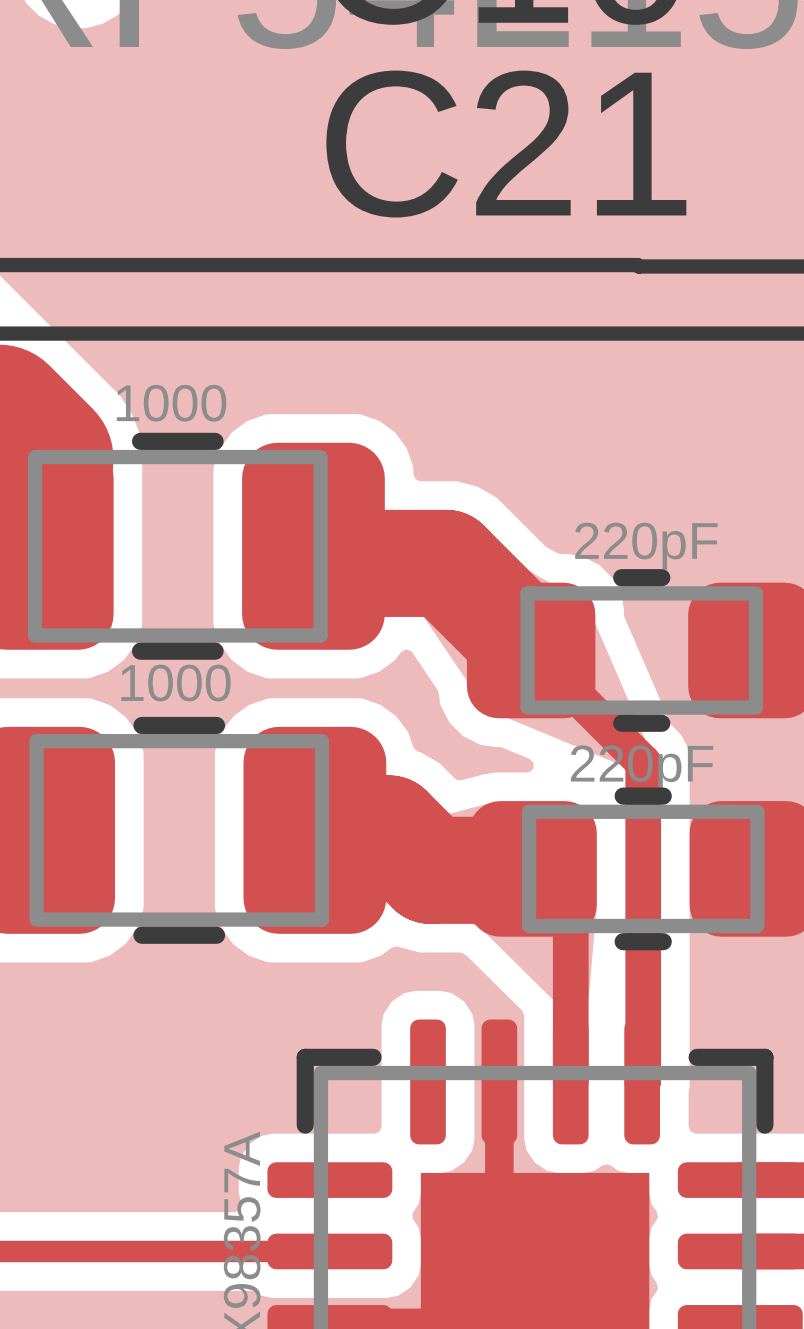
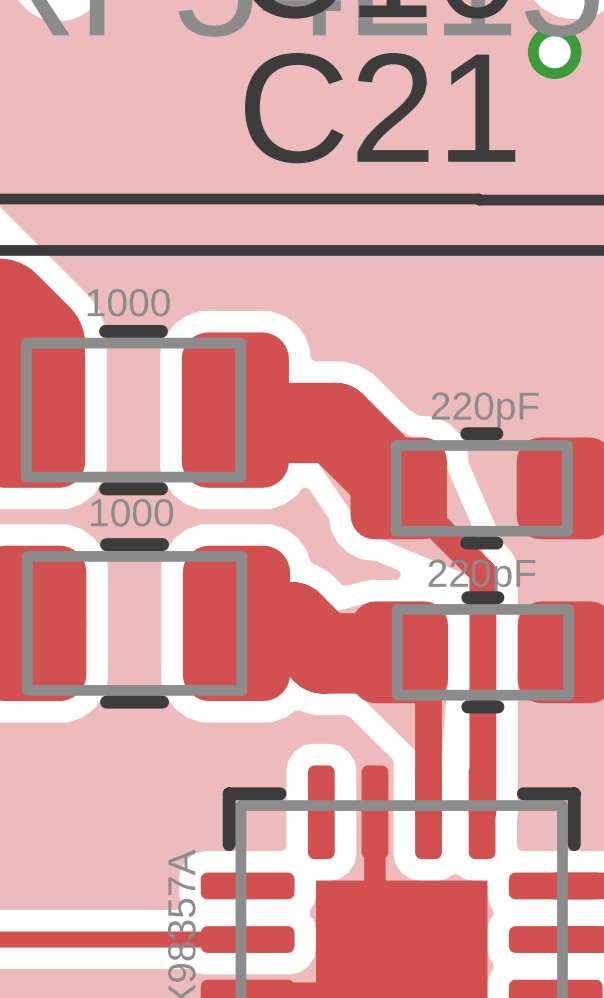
via: none -> (554, 52)

